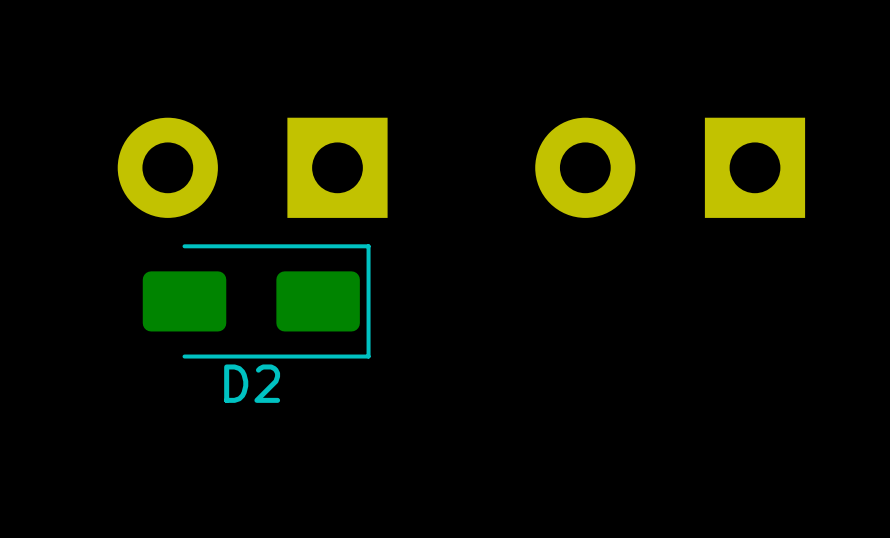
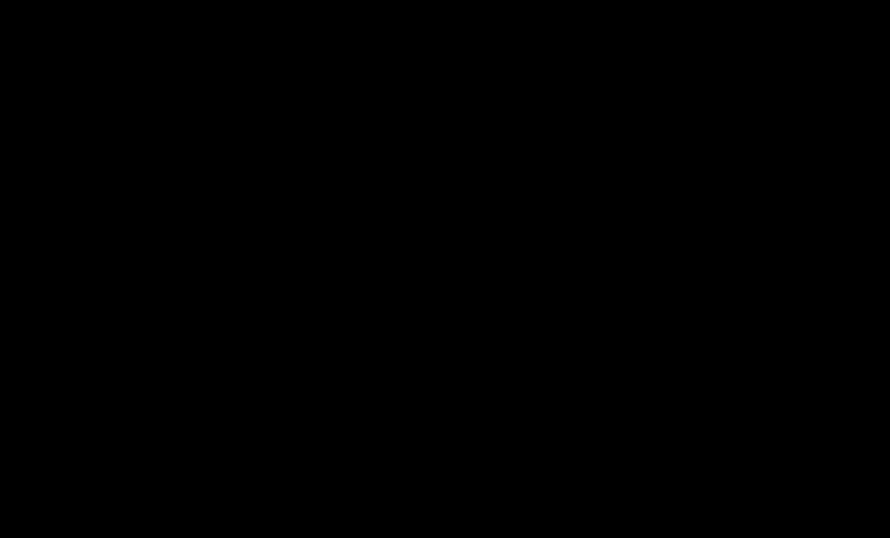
part: (252, 167) -> none
part: (670, 167) -> none
D2: (256, 301) -> none

